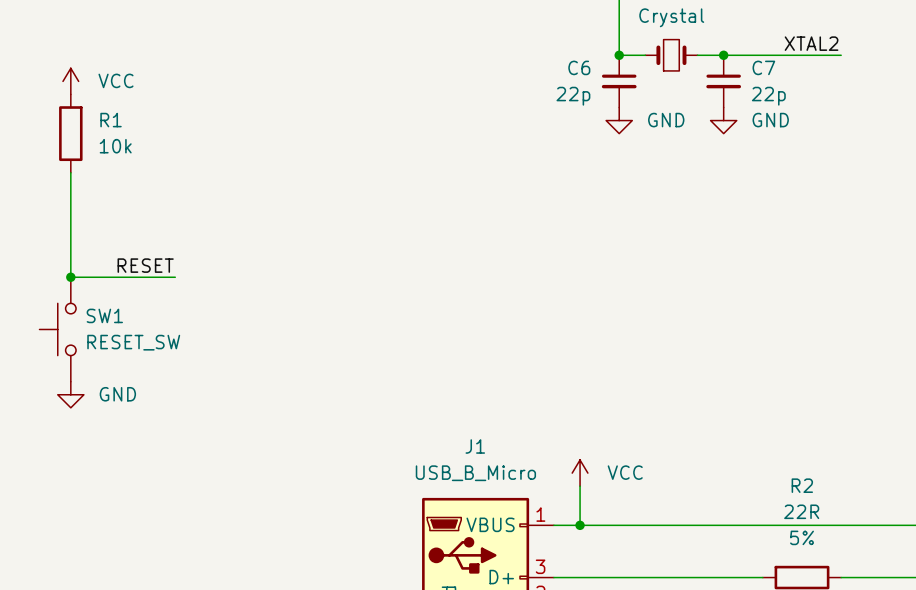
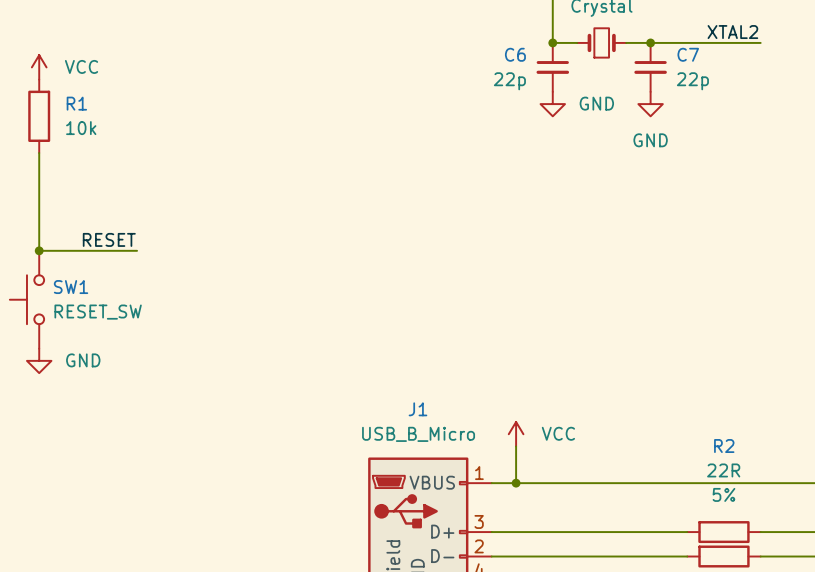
power symbol text position: GND (770, 120) -> GND (650, 140)

